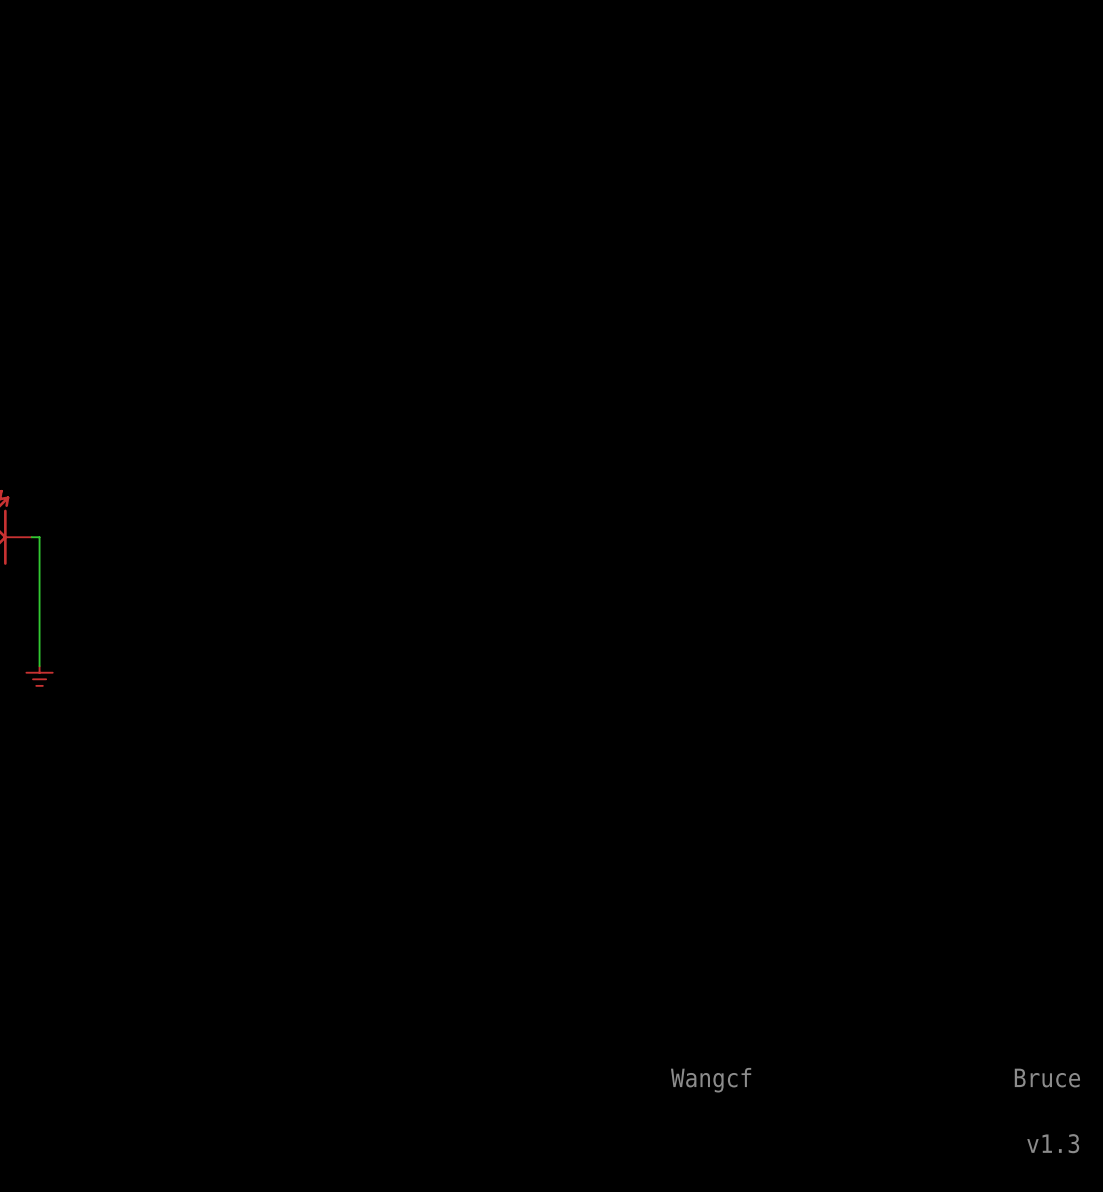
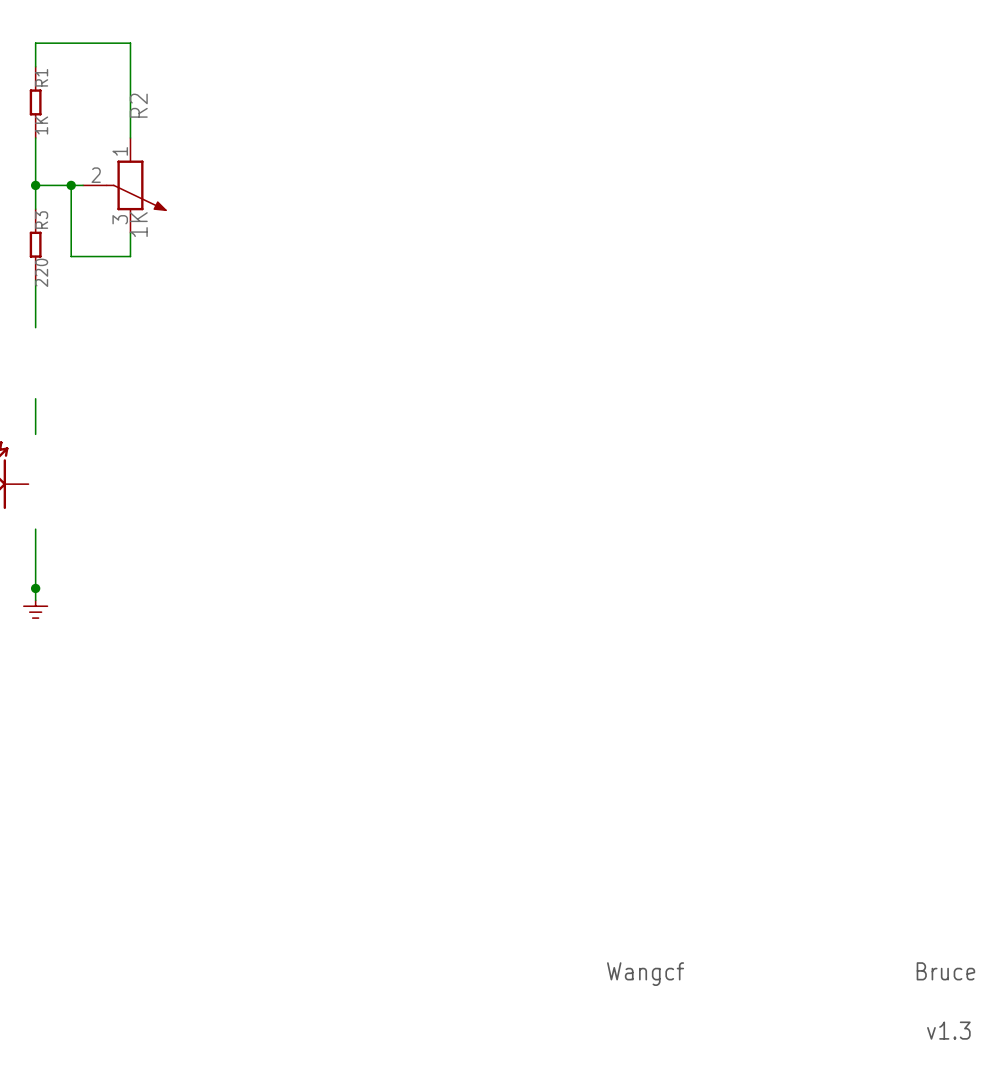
wire: none -> (35, 66) (35, 43) (130, 43) (130, 138)
R1: none -> 1K (35, 102)
wire: none -> (35, 138) (35, 209)
wire: none -> (35, 185) (83, 185)
junction: none -> (35, 185)
wire: none -> (71, 185) (71, 256) (130, 256) (130, 232)
junction: none -> (71, 185)
R2: none -> 1K (124, 185)
R3: none -> 220 (35, 244)
wire: none -> (35, 280) (35, 327)
wire: none -> (35, 398) (35, 434)
wire: (31, 537) (39, 537) (39, 587) -> none
junction: none -> (35, 588)

